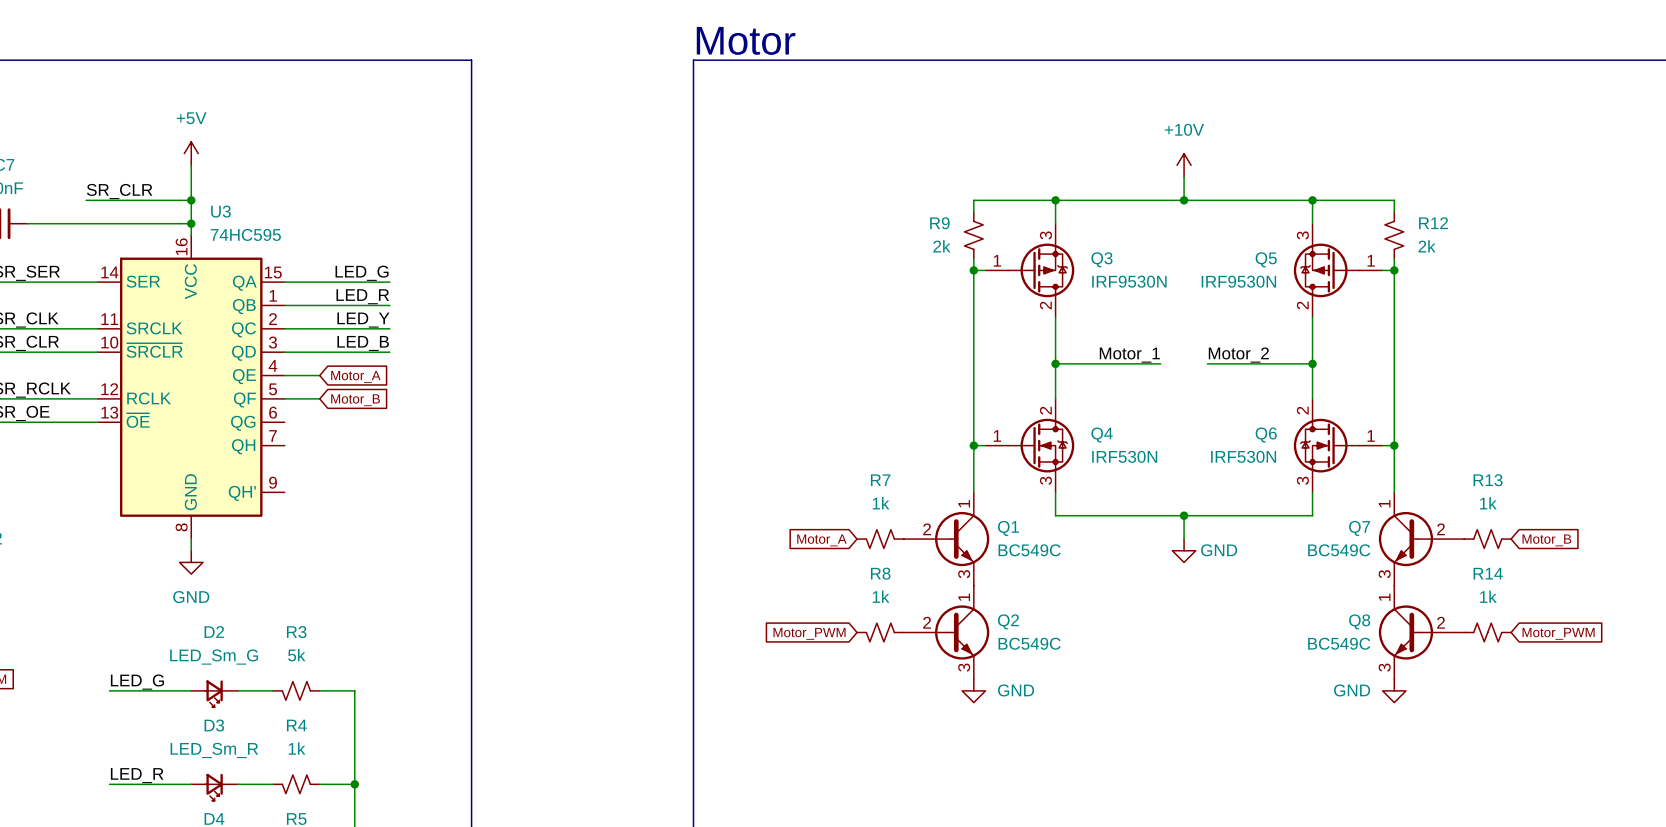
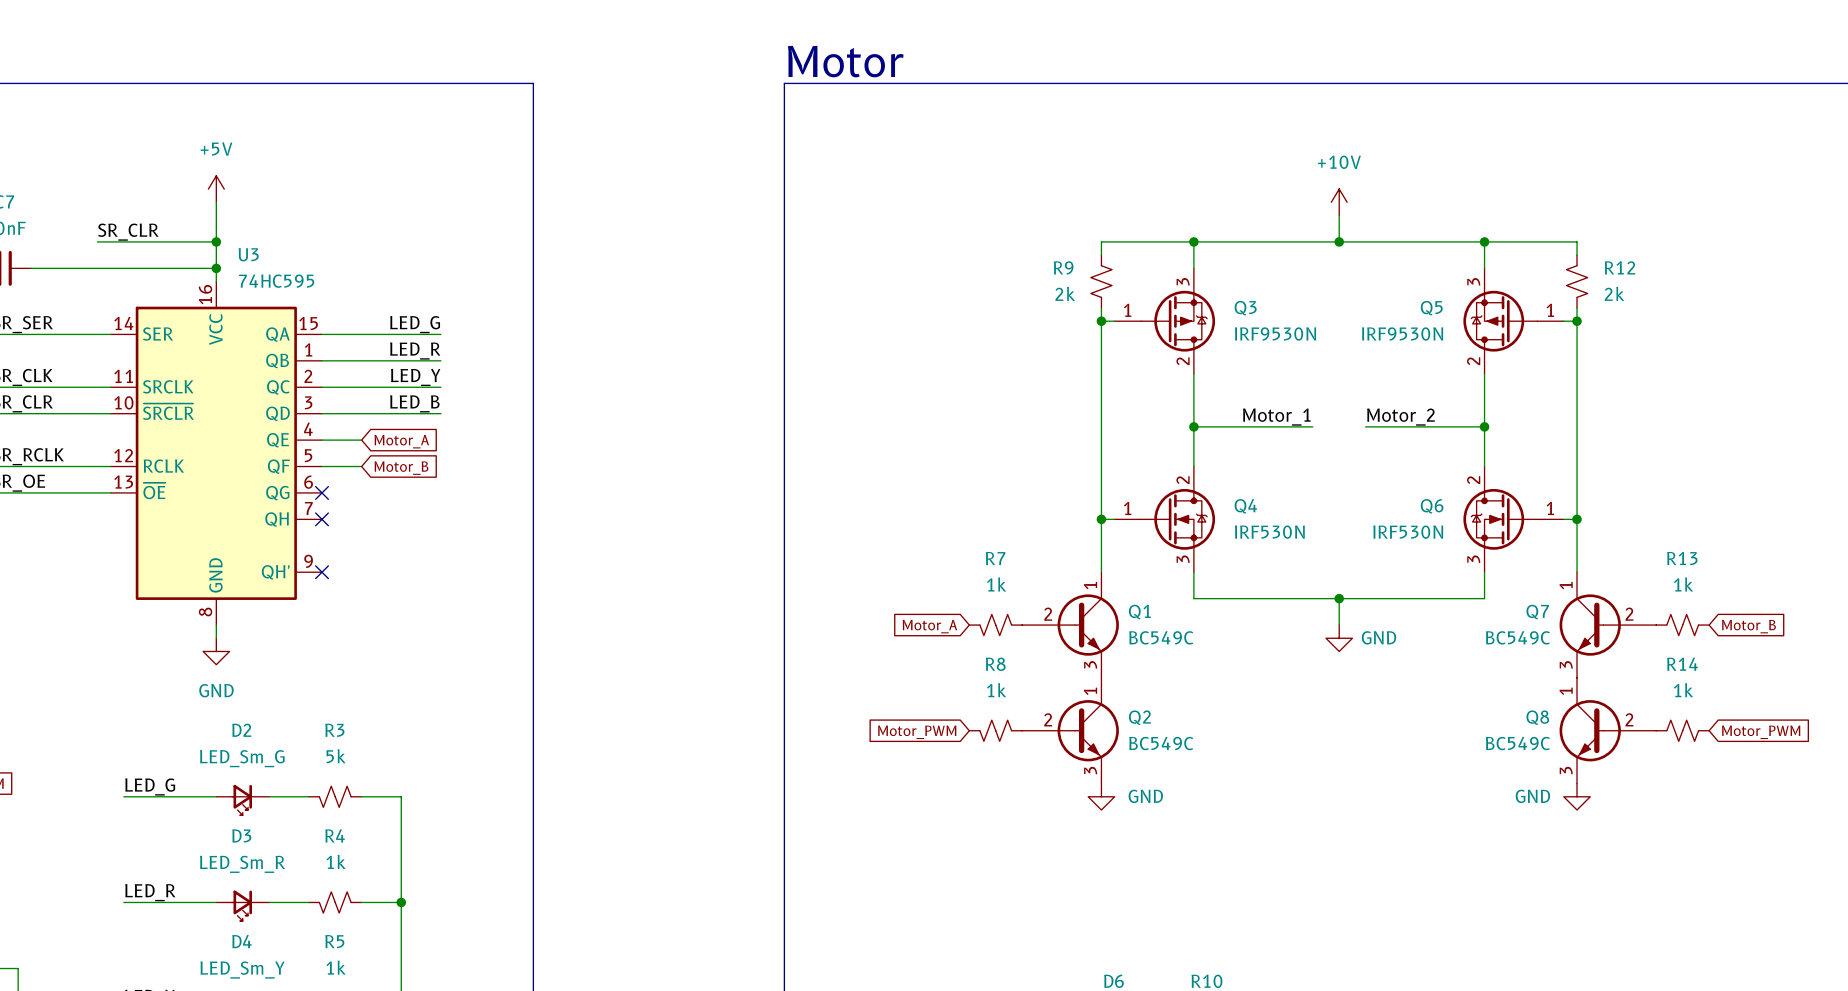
no-connect mark: none -> (322, 492)
no-connect mark: none -> (322, 519)
no-connect mark: none -> (322, 572)

